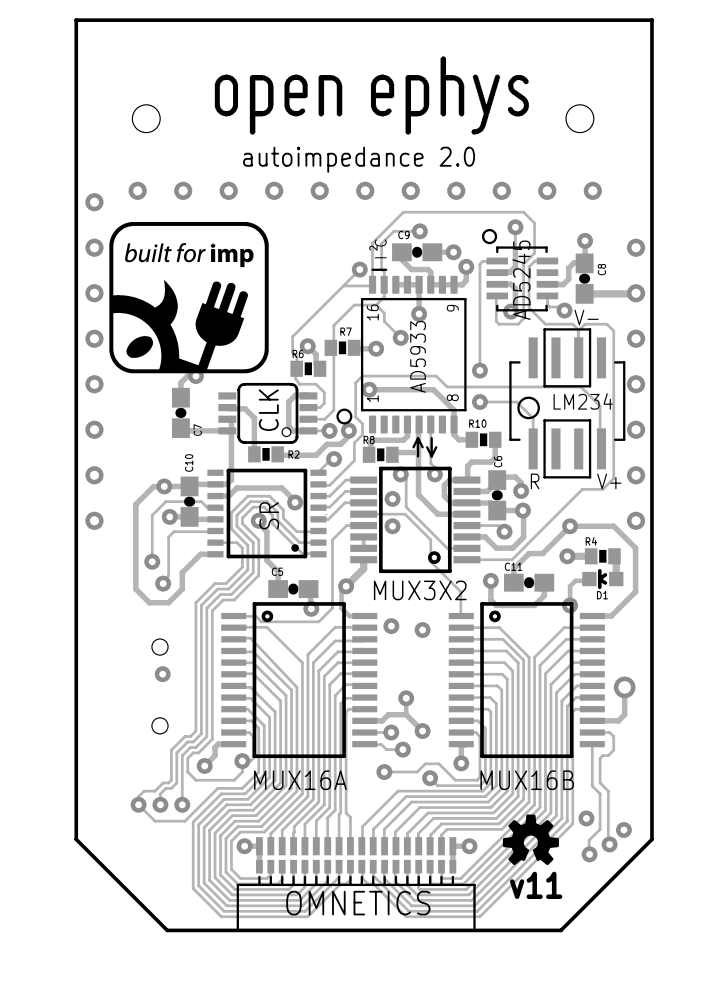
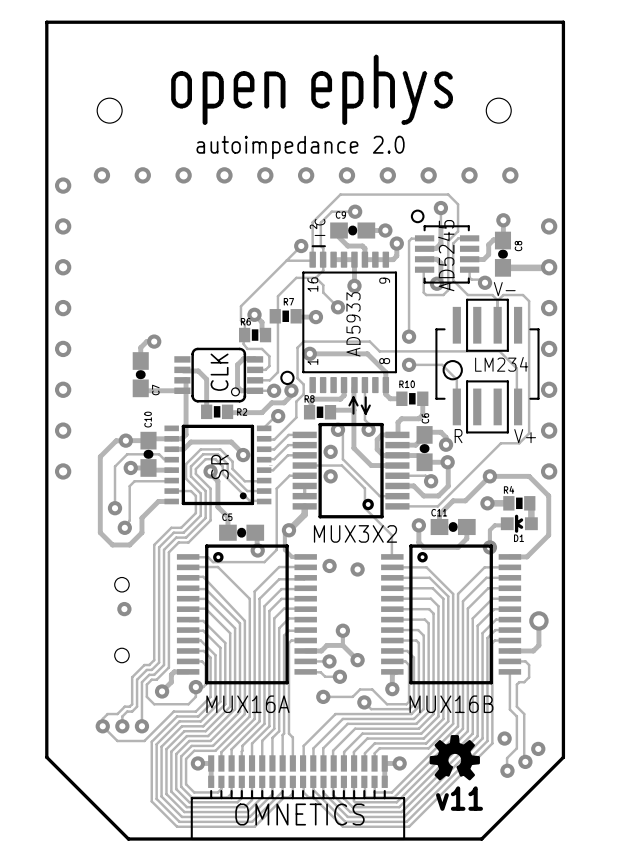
drawing: [109, 222, 269, 374] -> none

